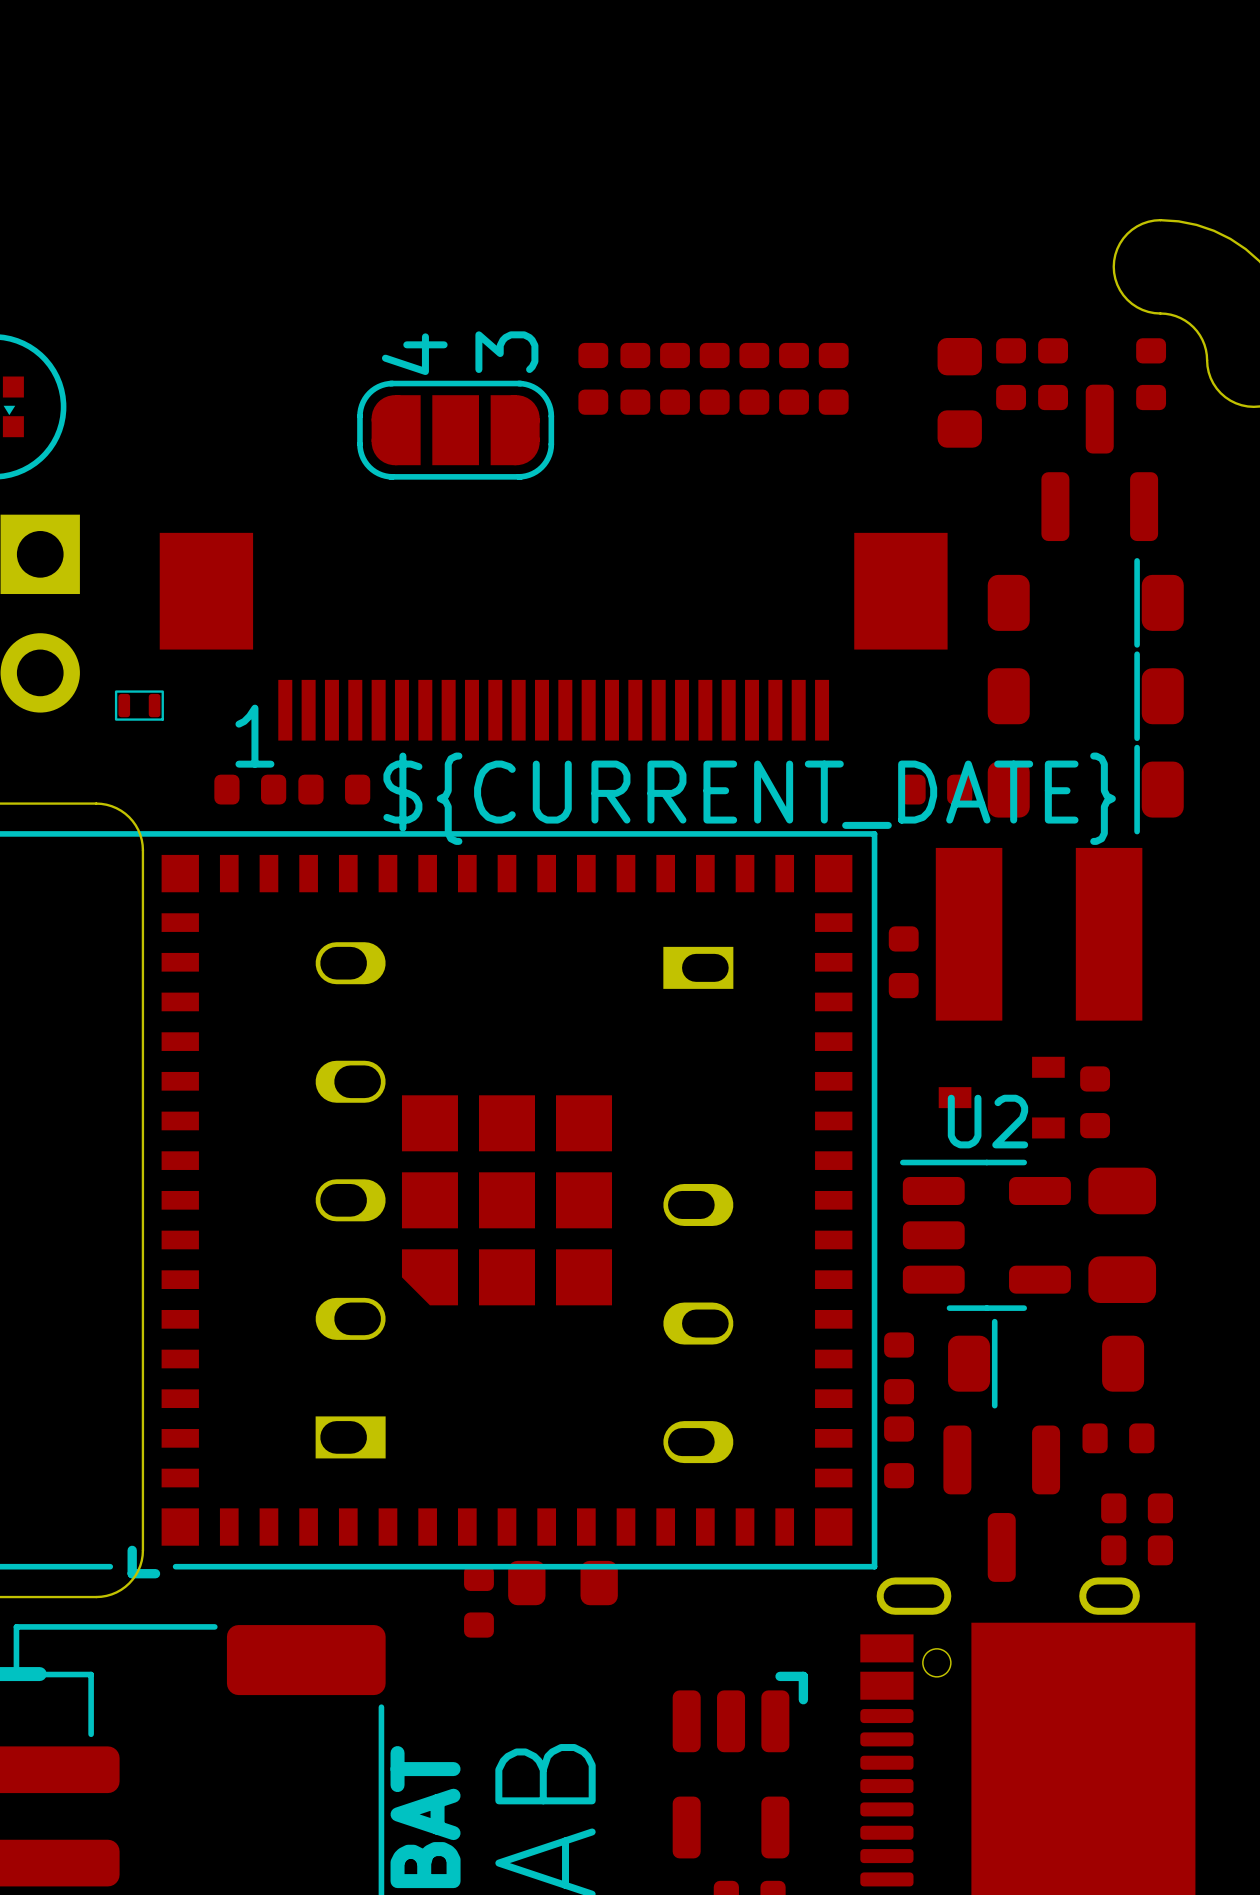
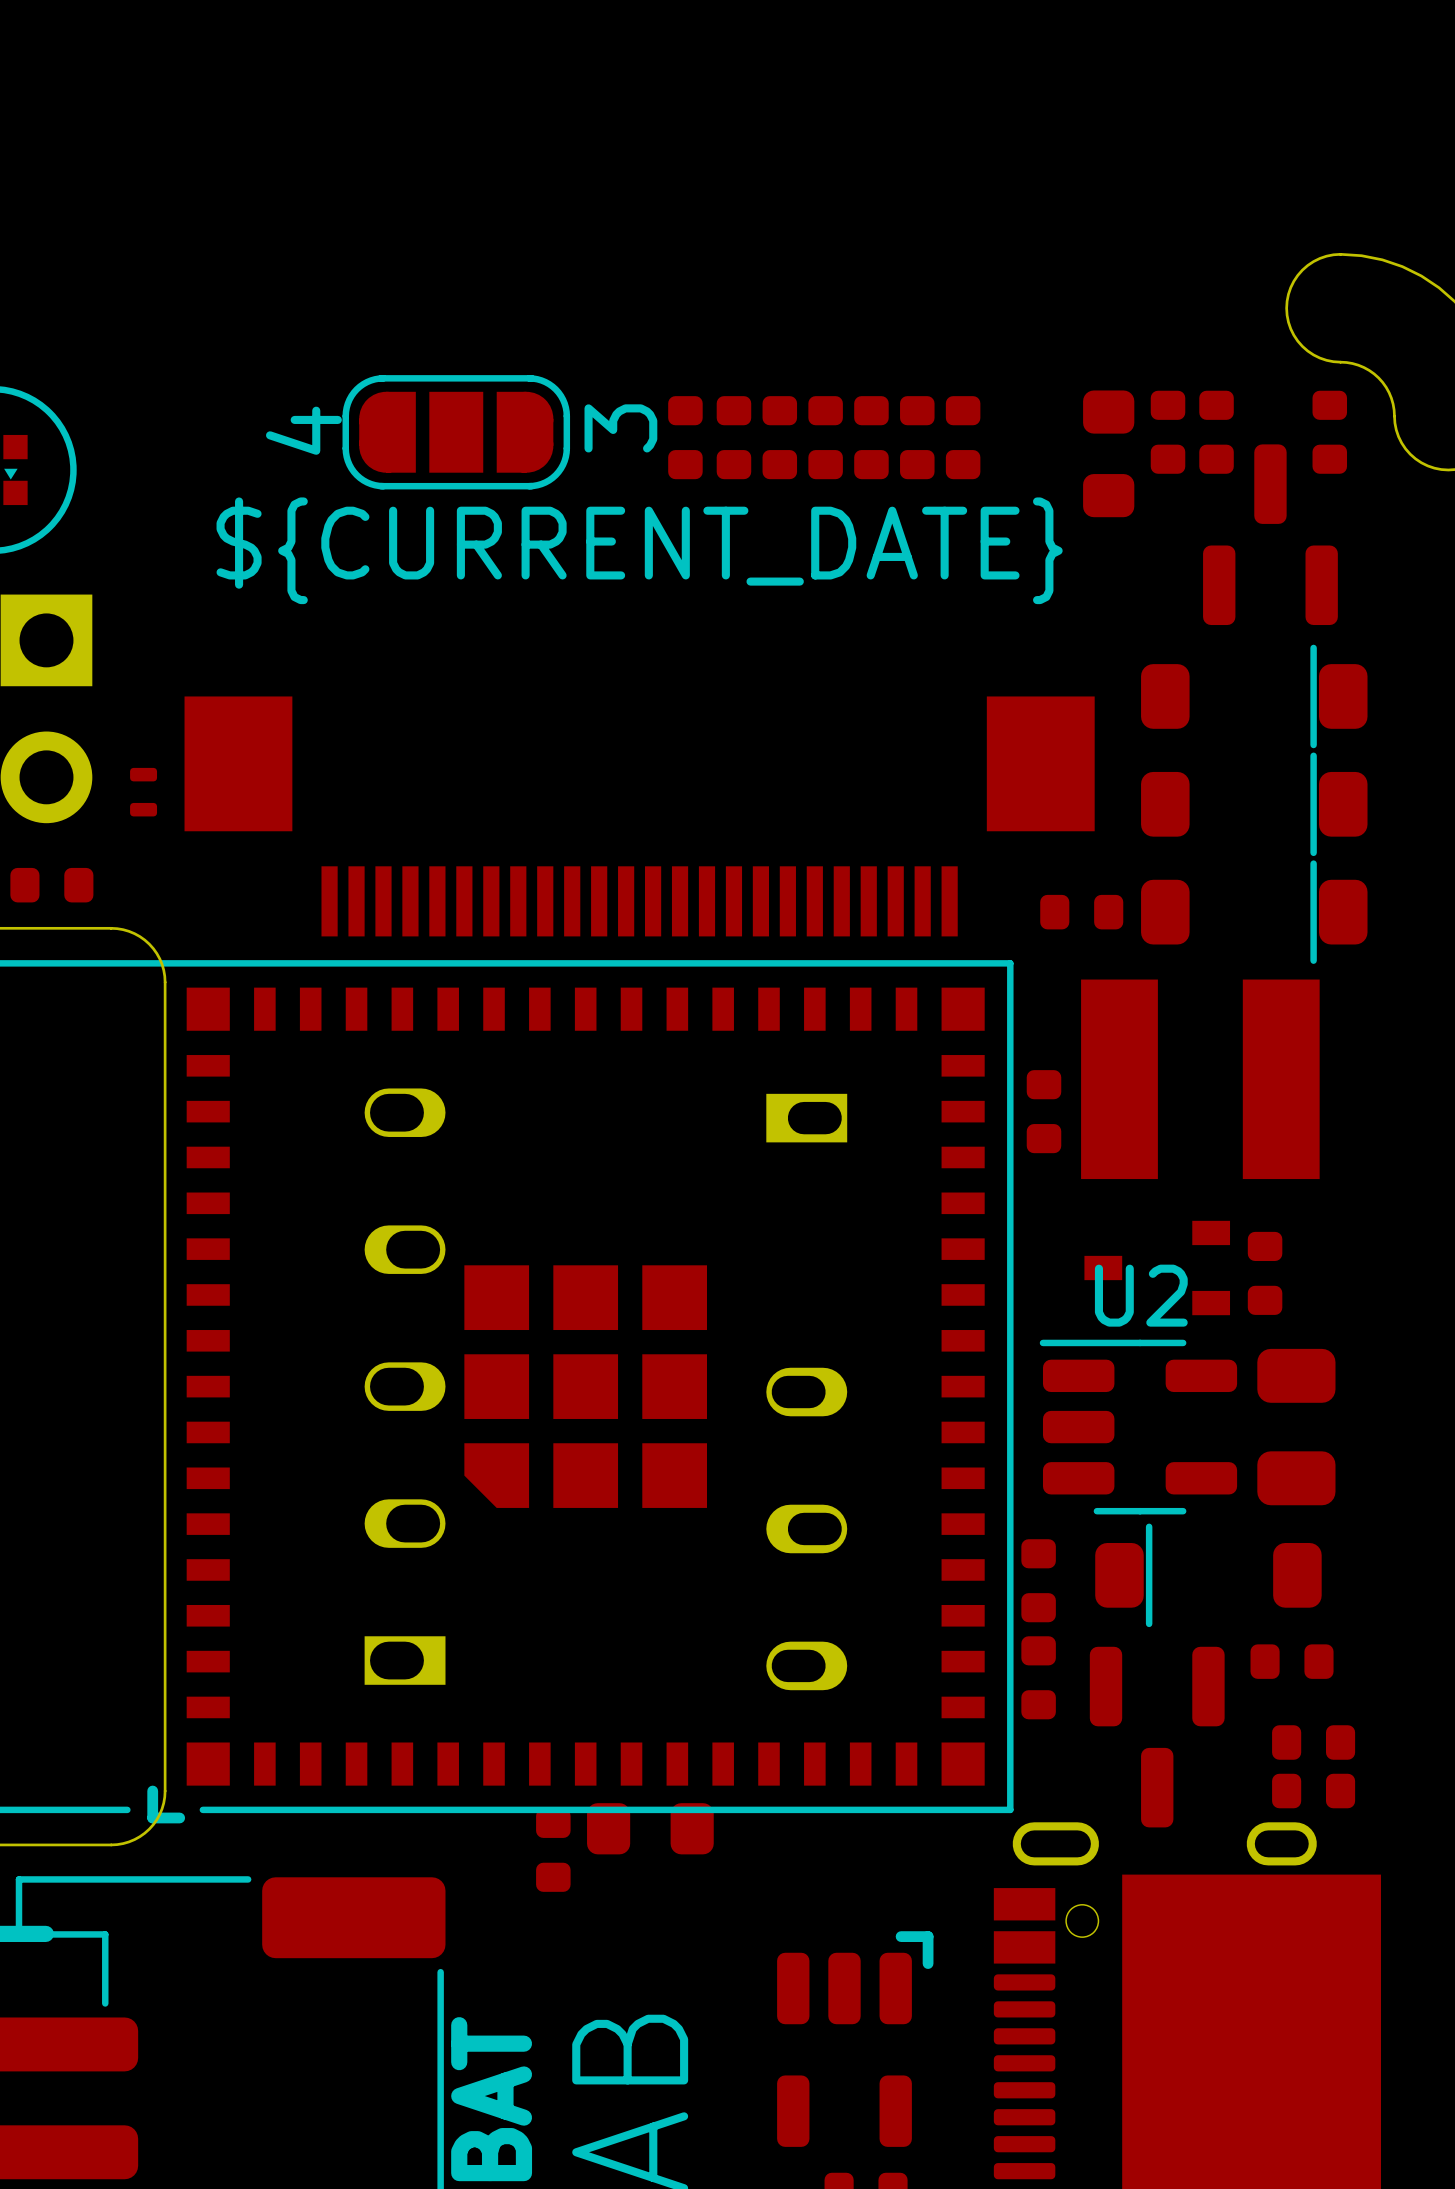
text position: 3 (506, 352) -> 3 (620, 428)
text position: 4 (414, 354) -> 4 (303, 430)
part position: (455, 430) -> (456, 432)
part position: (553, 636) -> (639, 816)
part footprint: [114, 690, 164, 721] -> [130, 767, 158, 817]
text: 1 (254, 736) -> none
part: none -> (51, 885)
part: (250, 789) -> none
part: (334, 789) -> none
text position: ${CURRENT_DATE} (749, 798) -> ${CURRENT_DATE} (639, 550)

